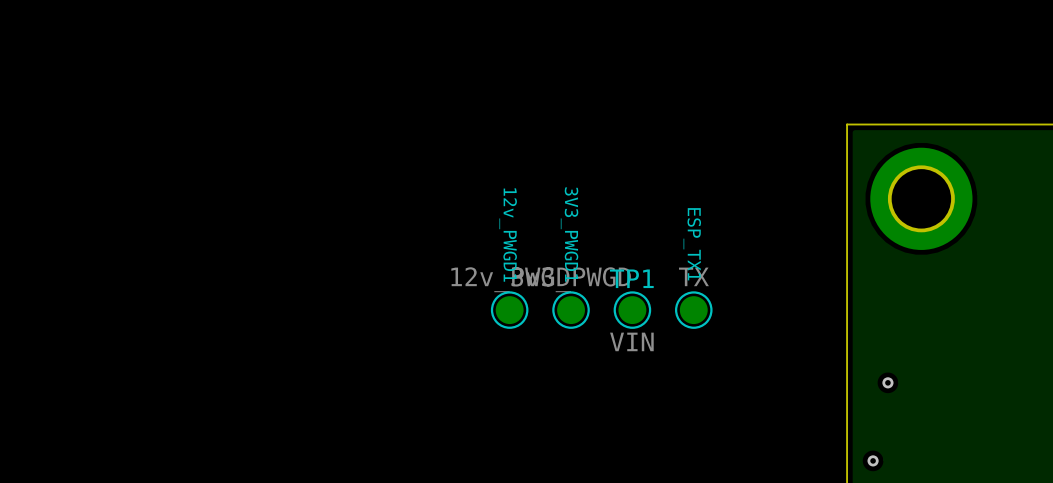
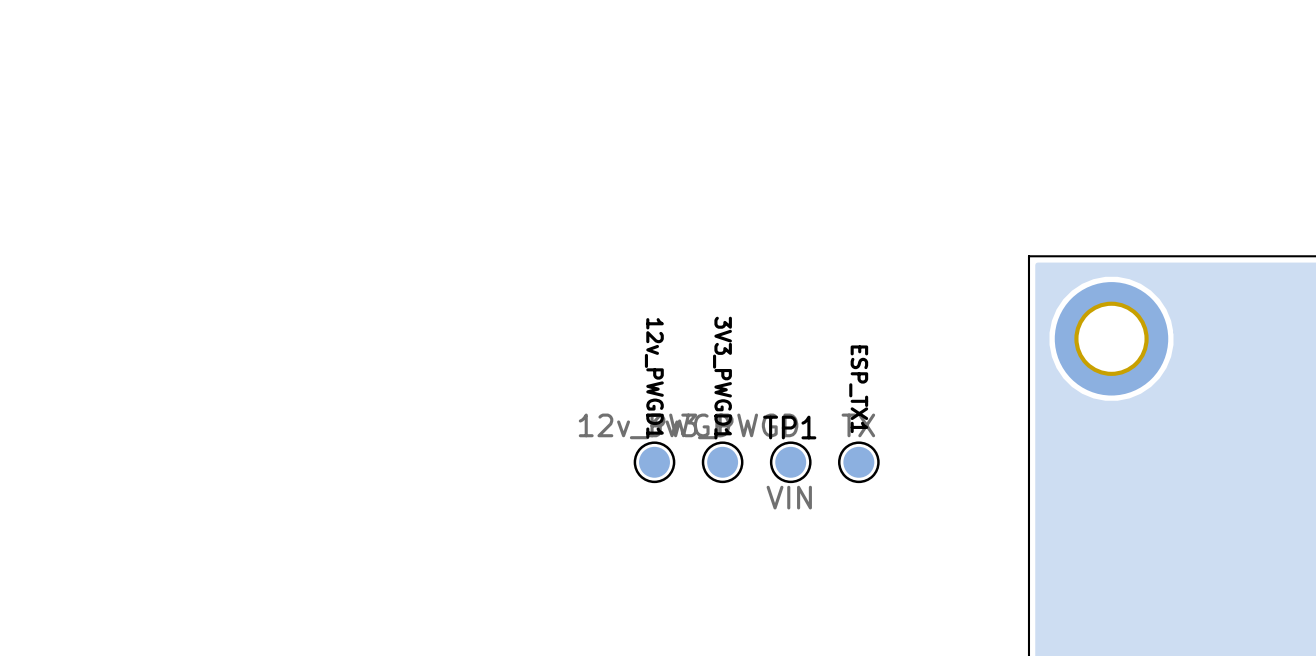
via: (887, 382) -> none
via: (873, 460) -> none

